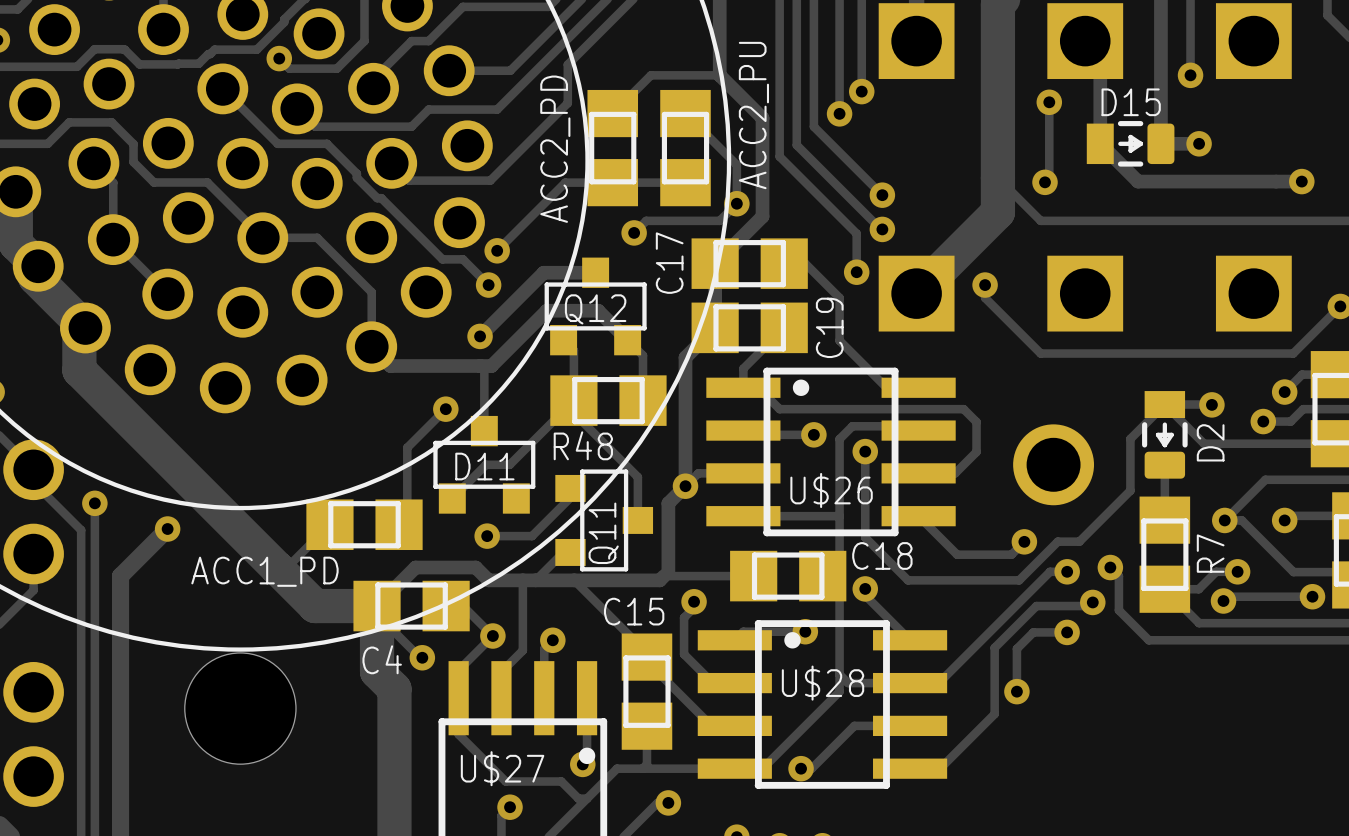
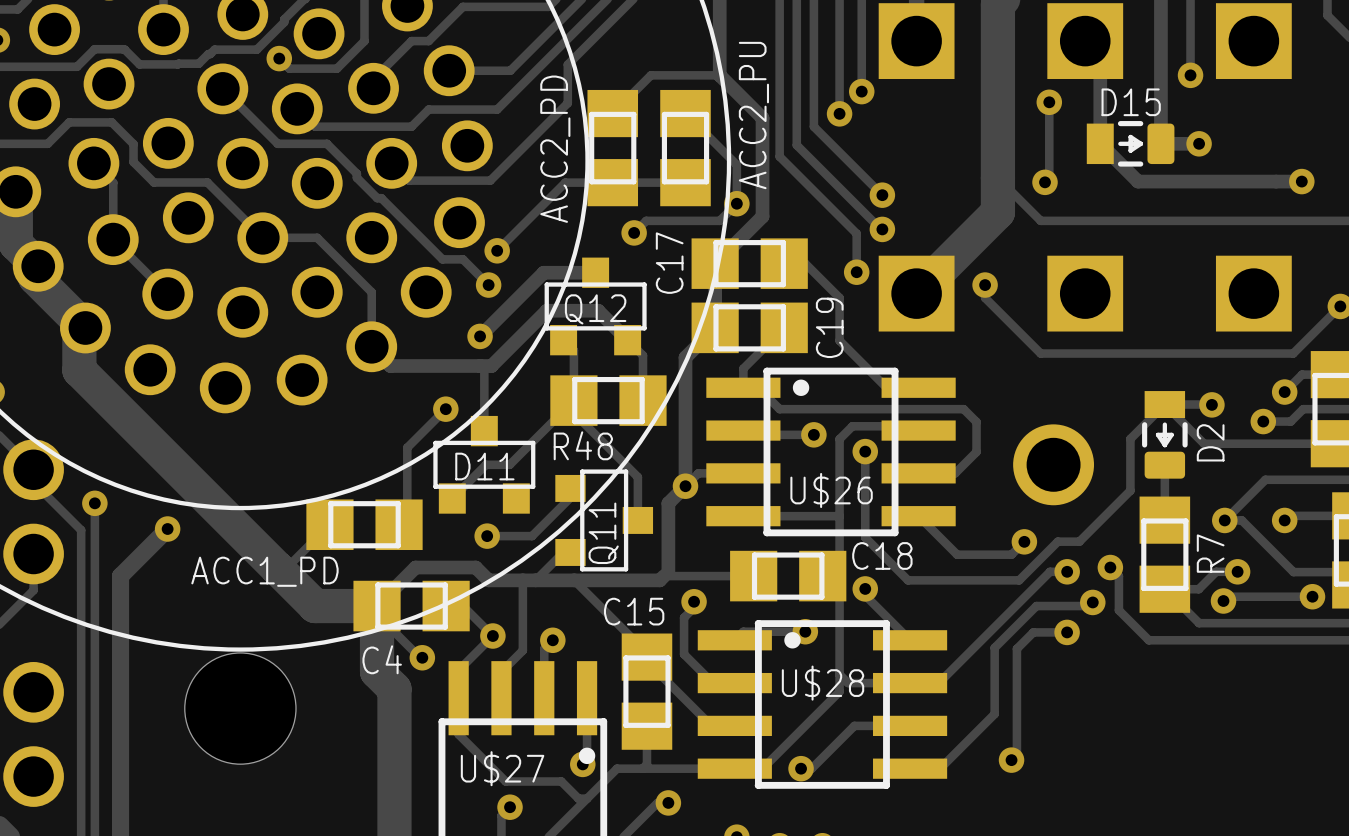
track: none -> (1016, 691) (1016, 754) (1011, 760)
via position: (1016, 691) -> (1011, 760)

